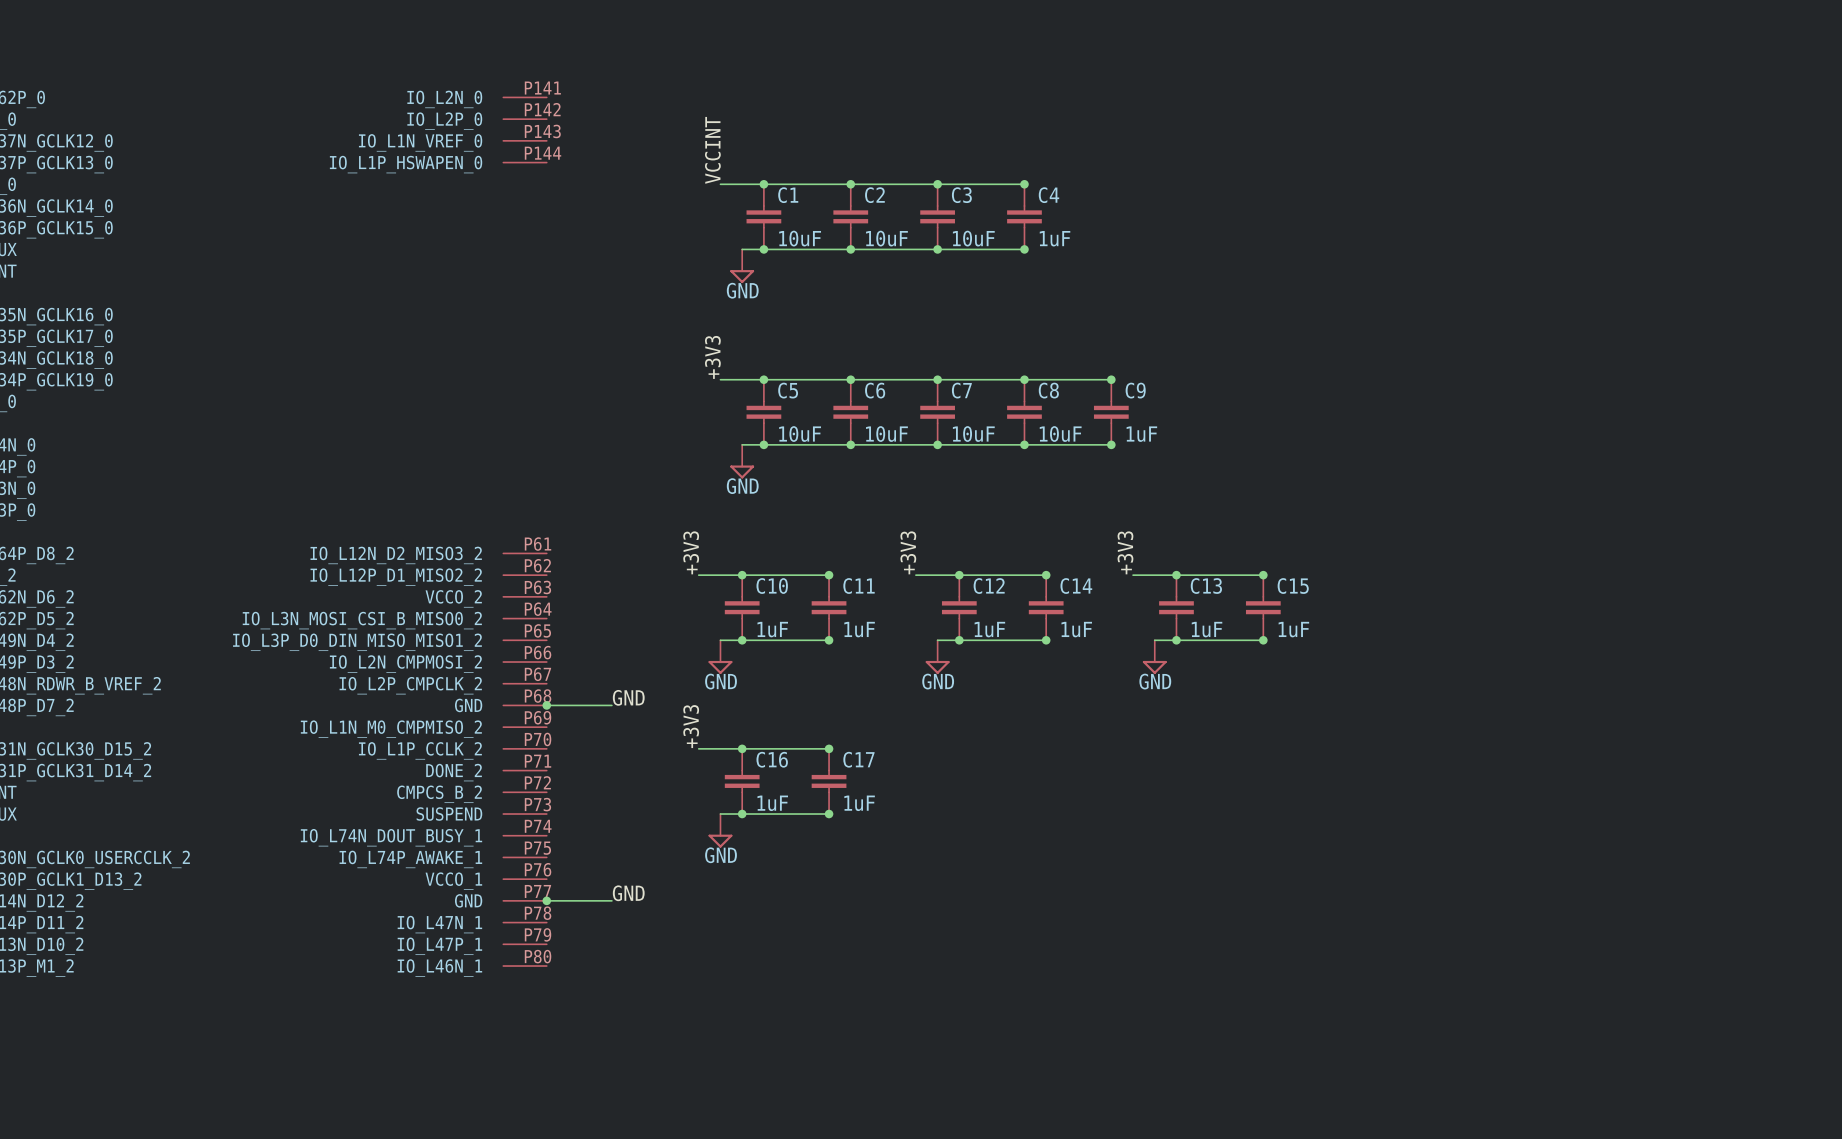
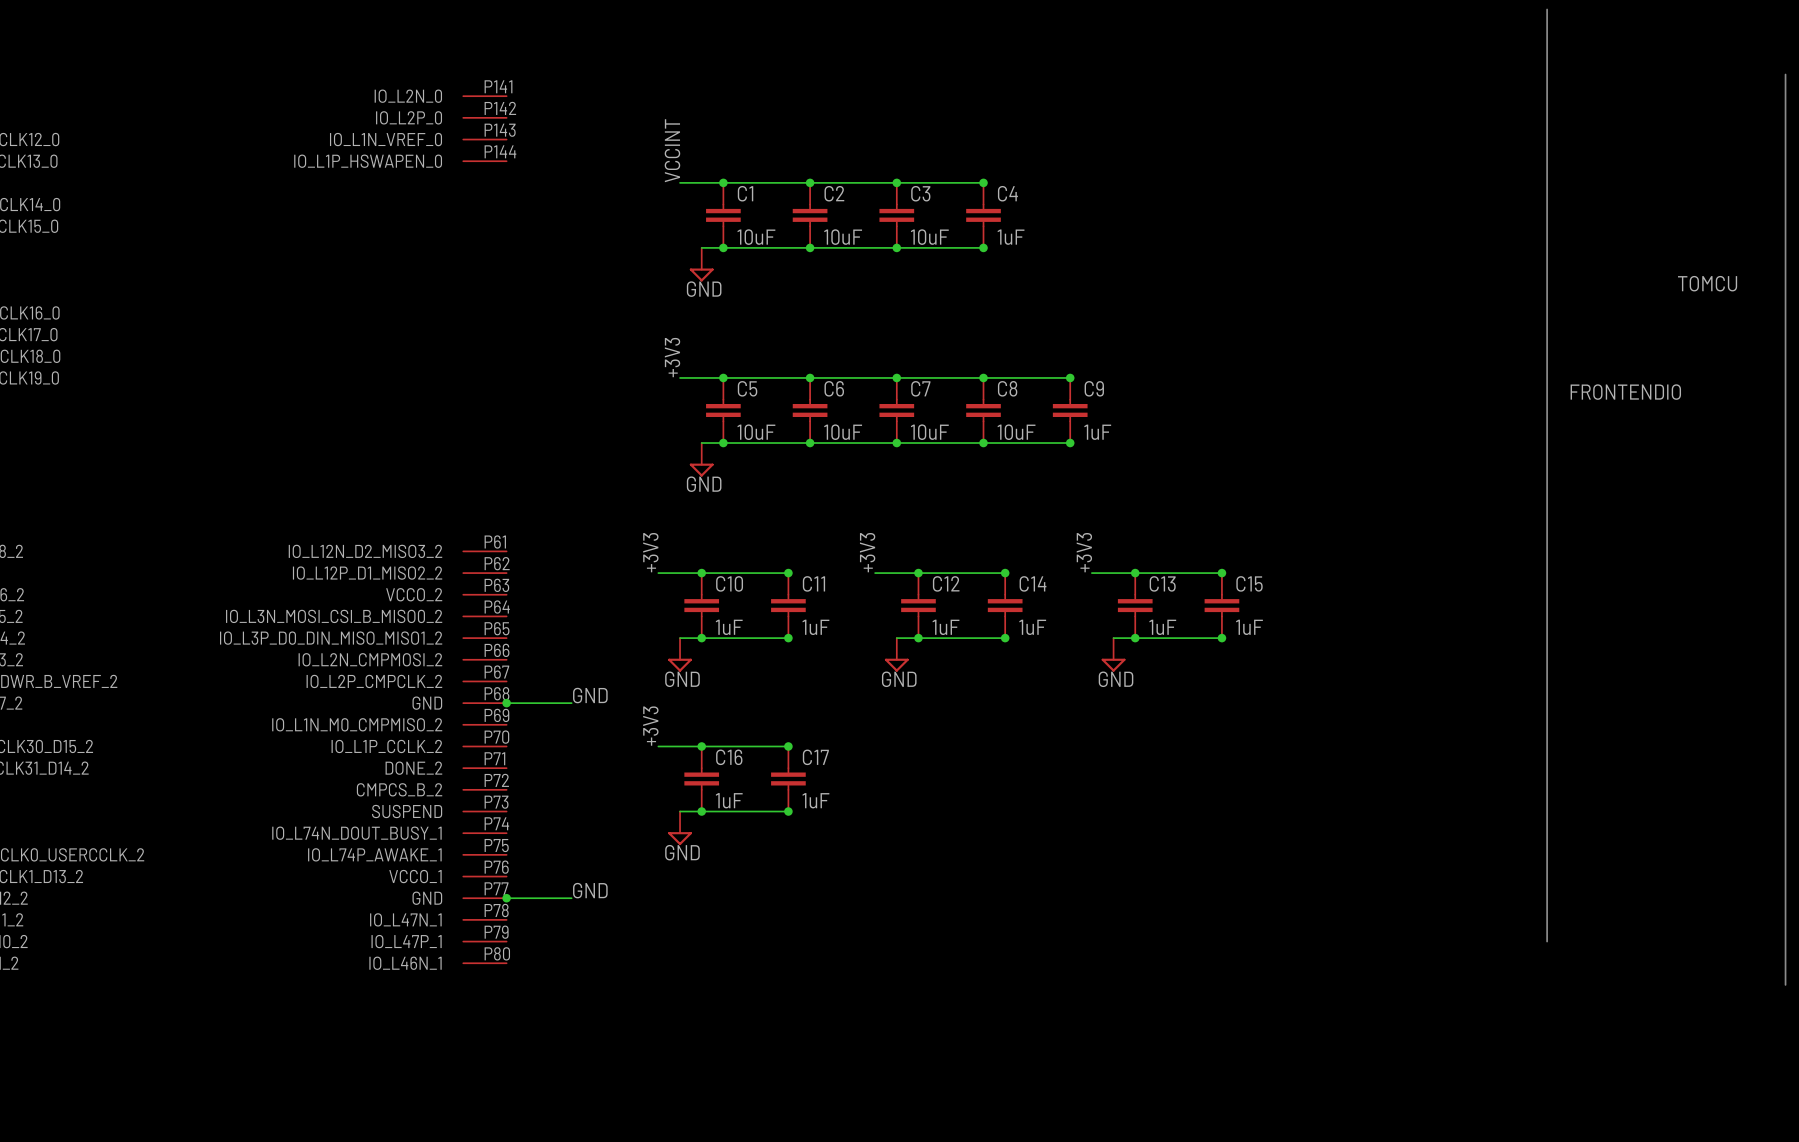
bus: none -> (1547, 9) (1547, 941)
bus: none -> (1785, 74) (1785, 984)
label: none -> TOMCU (1707, 283)
label: none -> FRONTENDIO (1625, 392)

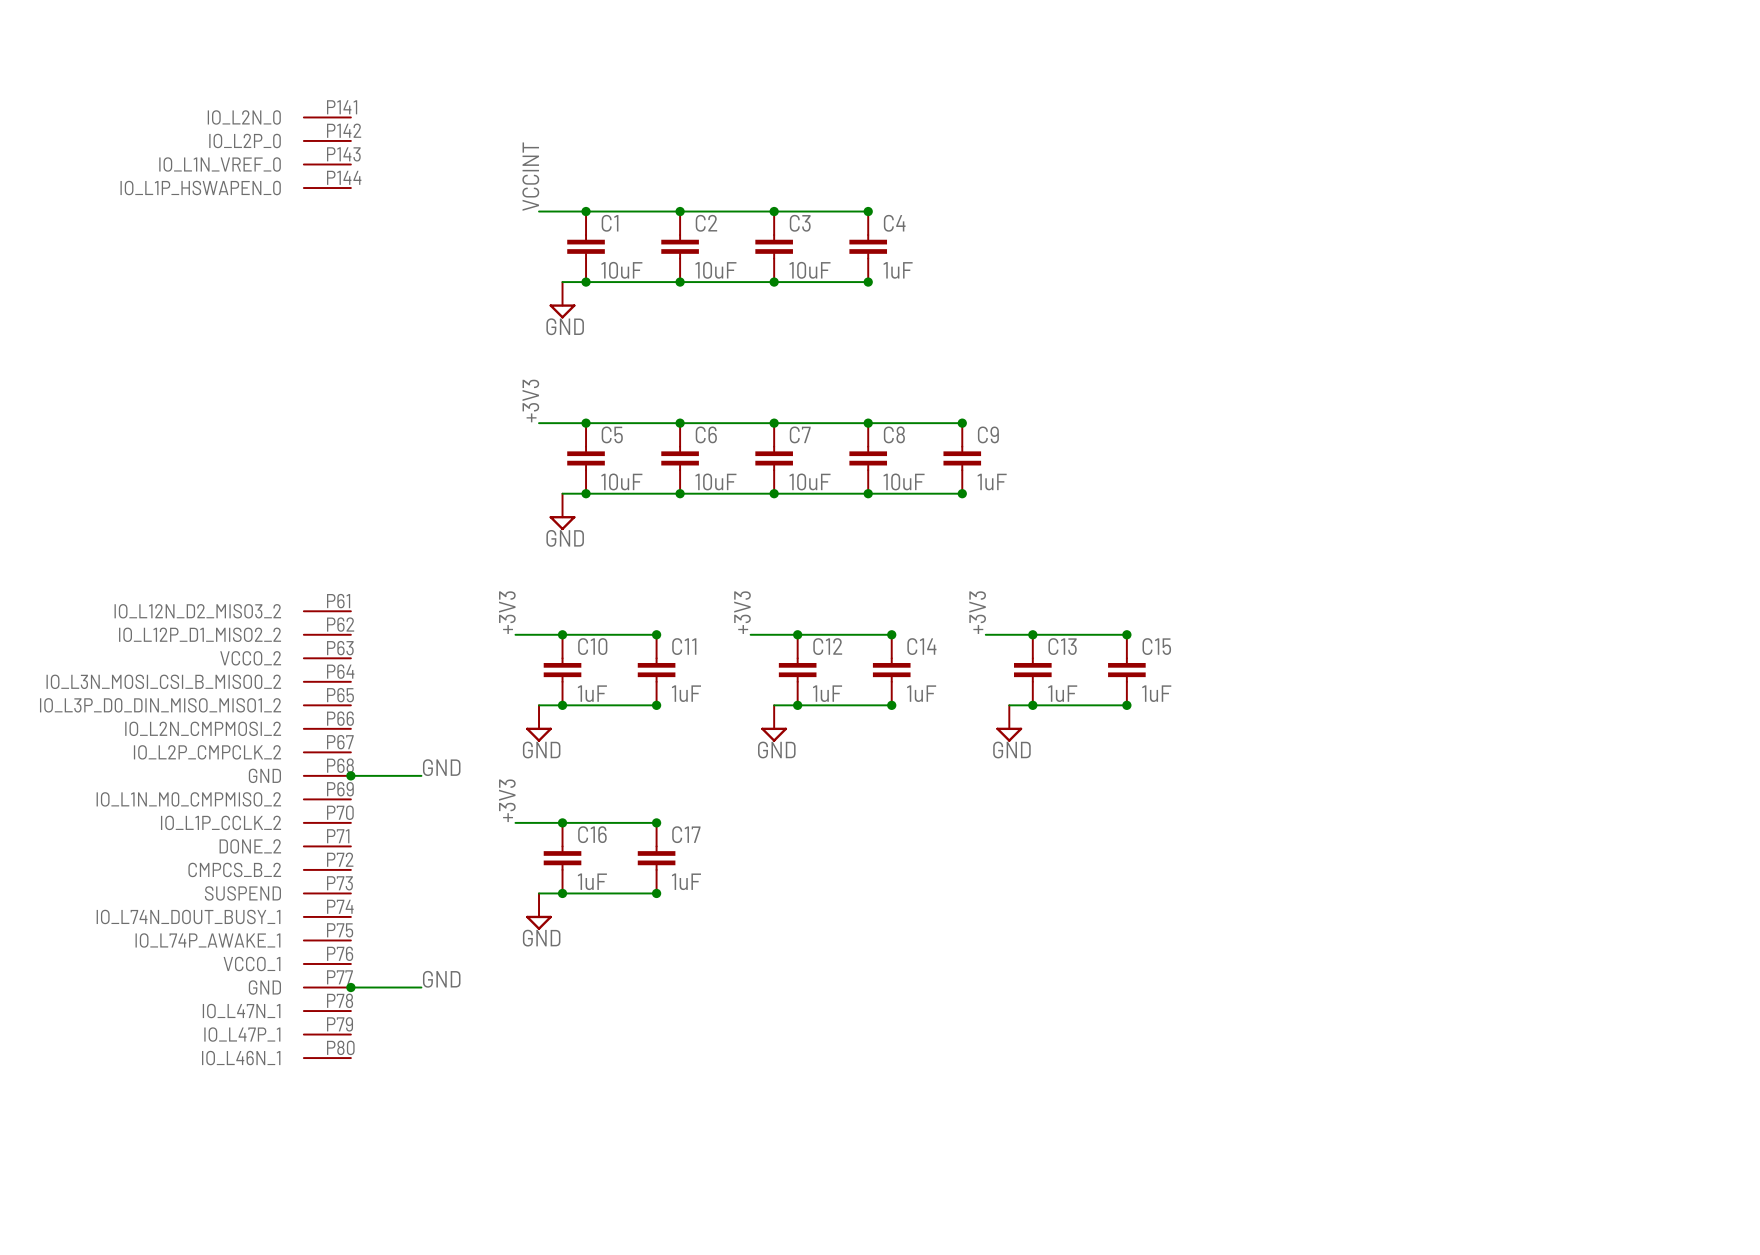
bus: (1547, 9) (1547, 941) -> none
bus: (1785, 74) (1785, 984) -> none
label: TOMCU (1707, 283) -> none
label: FRONTENDIO (1625, 392) -> none

